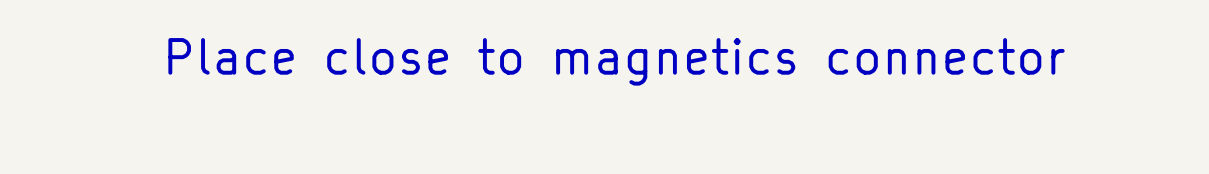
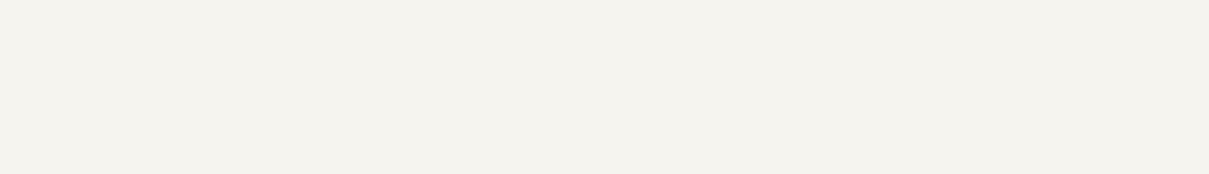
text: Place close to magnetics connector (616, 61) -> none

